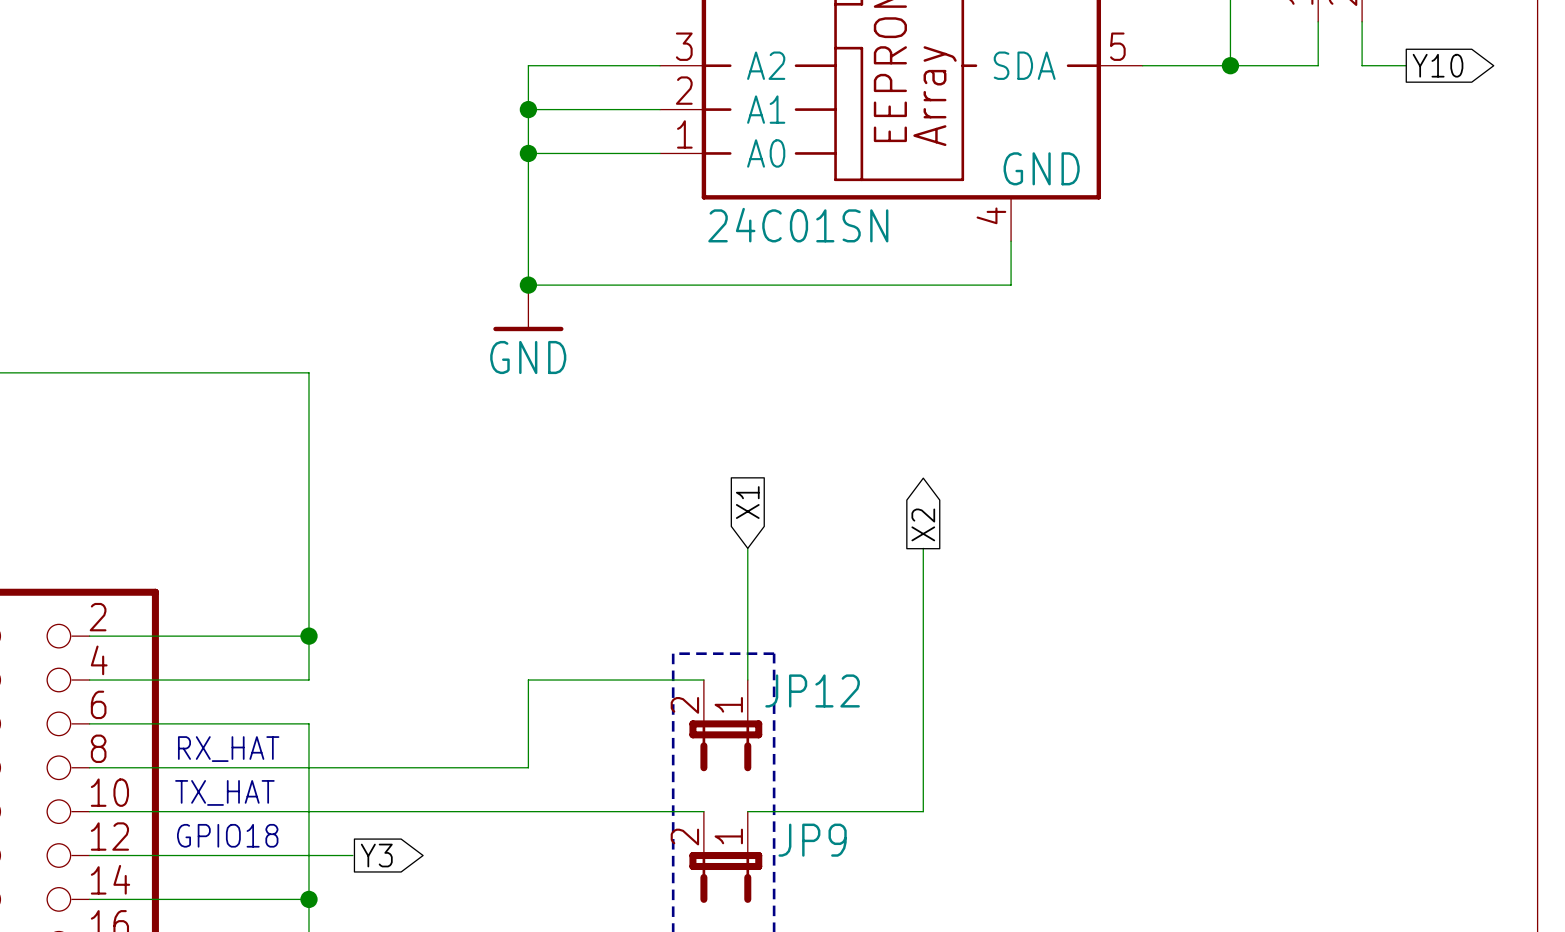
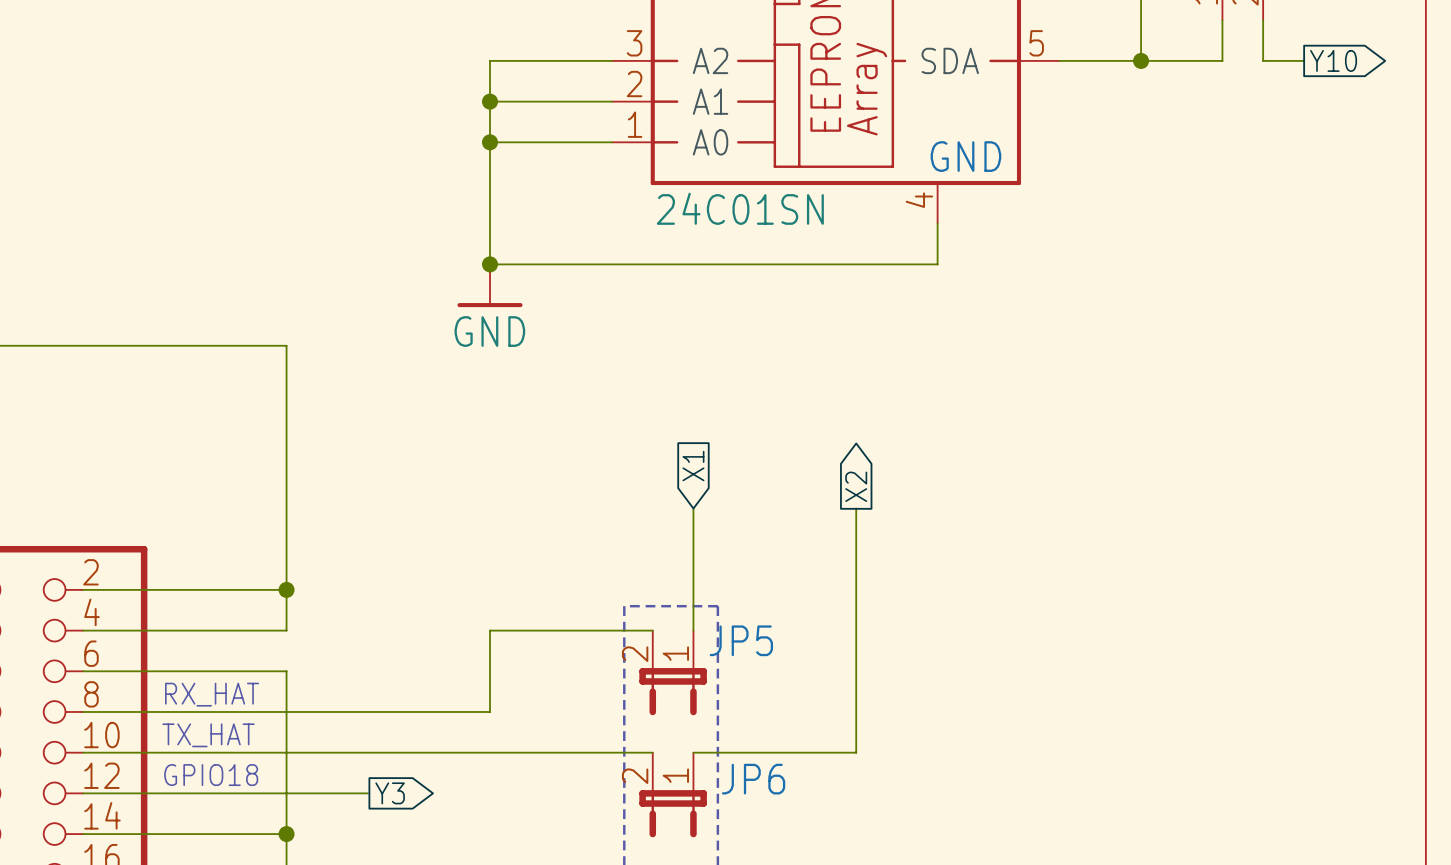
JP12 name: JP12 (812, 690) -> JP5 (741, 640)
JP9 name: JP9 (812, 840) -> JP6 (753, 779)
wire: none -> (327, 793) (367, 793)
global label position: Y3 (376, 855) -> Y3 (390, 793)

